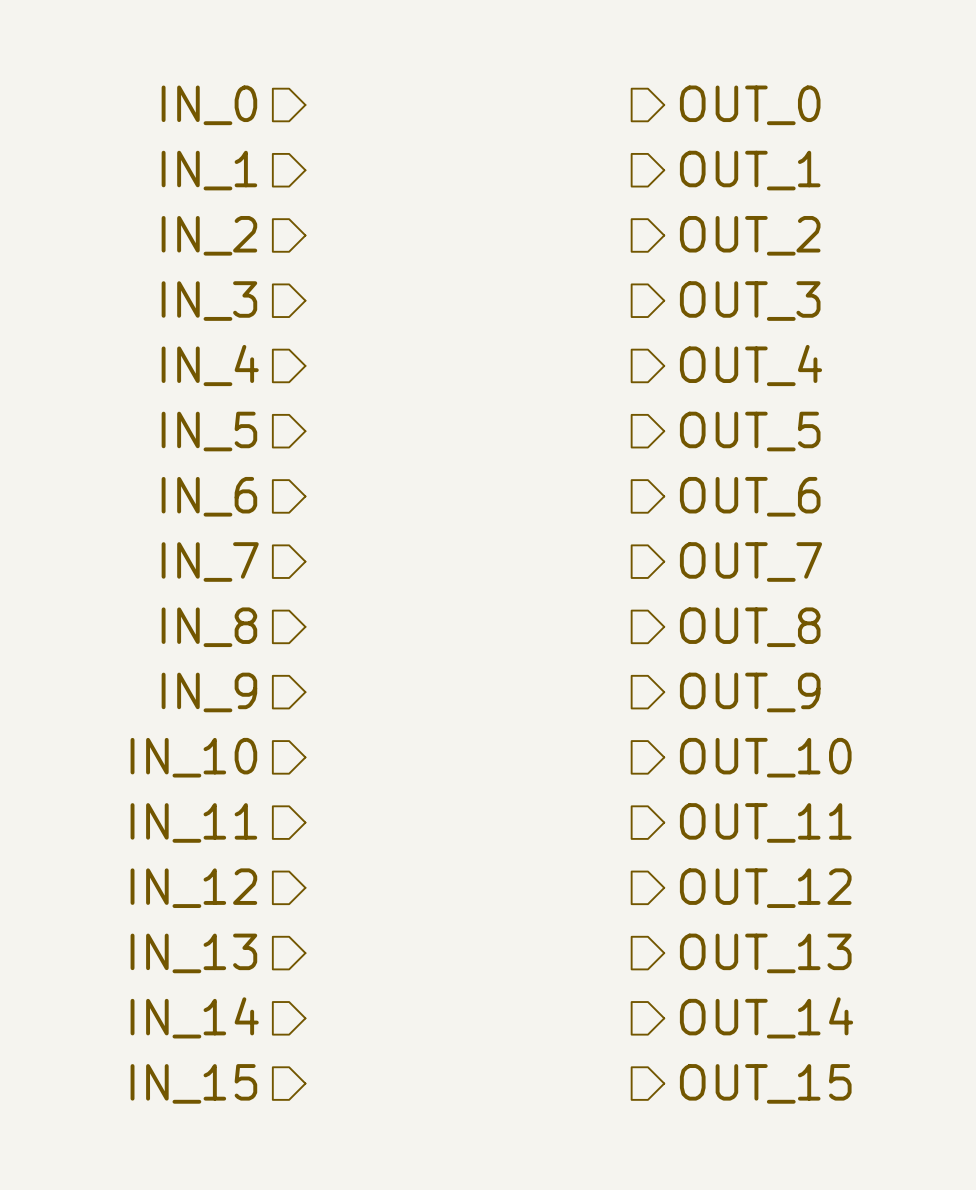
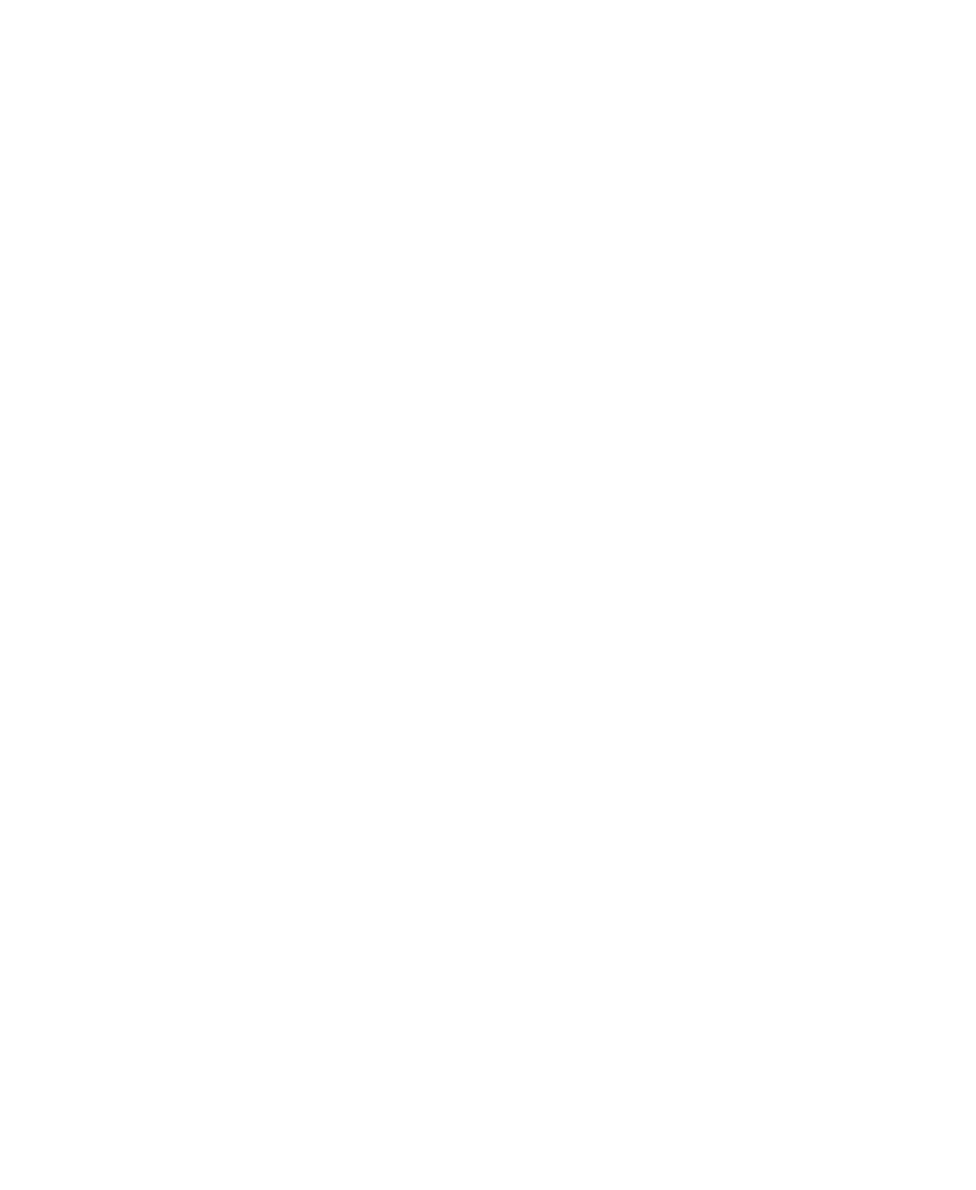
hierarchical label: IN_0 (209, 105) -> none
hierarchical label: OUT_0 (750, 105) -> none
hierarchical label: IN_1 (209, 170) -> none
hierarchical label: OUT_1 (750, 170) -> none
hierarchical label: IN_2 (209, 235) -> none
hierarchical label: OUT_2 (750, 235) -> none
hierarchical label: IN_3 (209, 301) -> none
hierarchical label: OUT_3 (750, 301) -> none
hierarchical label: IN_4 (210, 365) -> none
hierarchical label: OUT_4 (750, 365) -> none
hierarchical label: IN_5 (209, 431) -> none
hierarchical label: OUT_5 (750, 431) -> none
hierarchical label: IN_6 (209, 496) -> none
hierarchical label: OUT_6 (750, 496) -> none
hierarchical label: IN_7 (210, 562) -> none
hierarchical label: OUT_7 (750, 562) -> none
hierarchical label: IN_8 (209, 627) -> none
hierarchical label: OUT_8 (750, 627) -> none
hierarchical label: IN_9 (209, 692) -> none
hierarchical label: OUT_9 (750, 692) -> none
hierarchical label: IN_10 (193, 757) -> none
hierarchical label: OUT_10 (765, 757) -> none
hierarchical label: IN_11 (193, 822) -> none
hierarchical label: OUT_11 (765, 822) -> none
hierarchical label: IN_12 (193, 888) -> none
hierarchical label: OUT_12 (765, 888) -> none
hierarchical label: IN_13 (193, 953) -> none
hierarchical label: OUT_13 (765, 953) -> none
hierarchical label: IN_14 (194, 1017) -> none
hierarchical label: OUT_14 (766, 1017) -> none
hierarchical label: IN_15 (193, 1083) -> none
hierarchical label: OUT_15 (765, 1083) -> none

